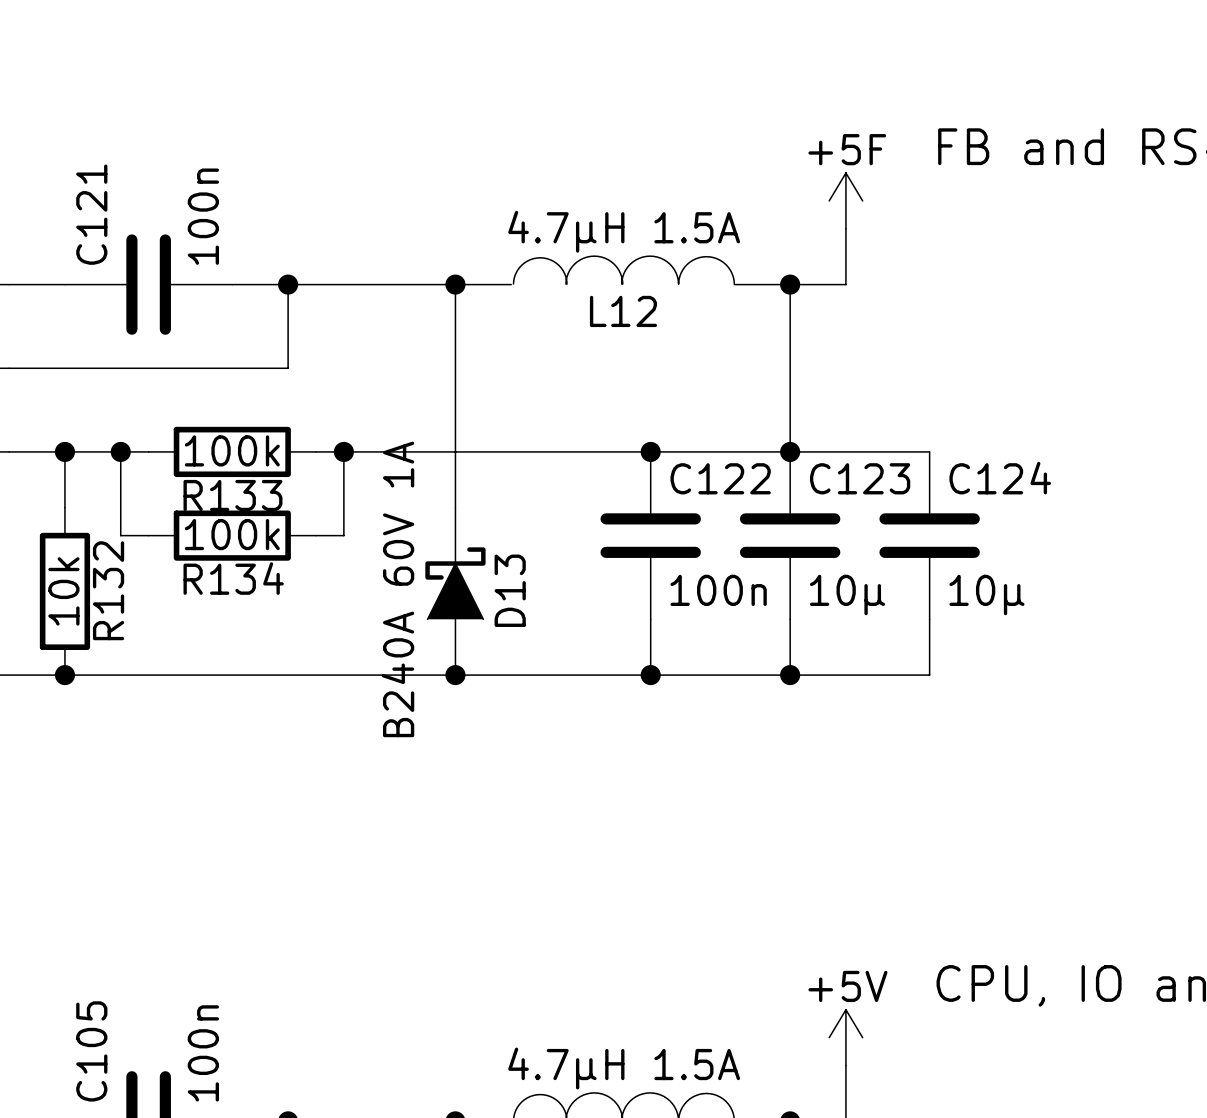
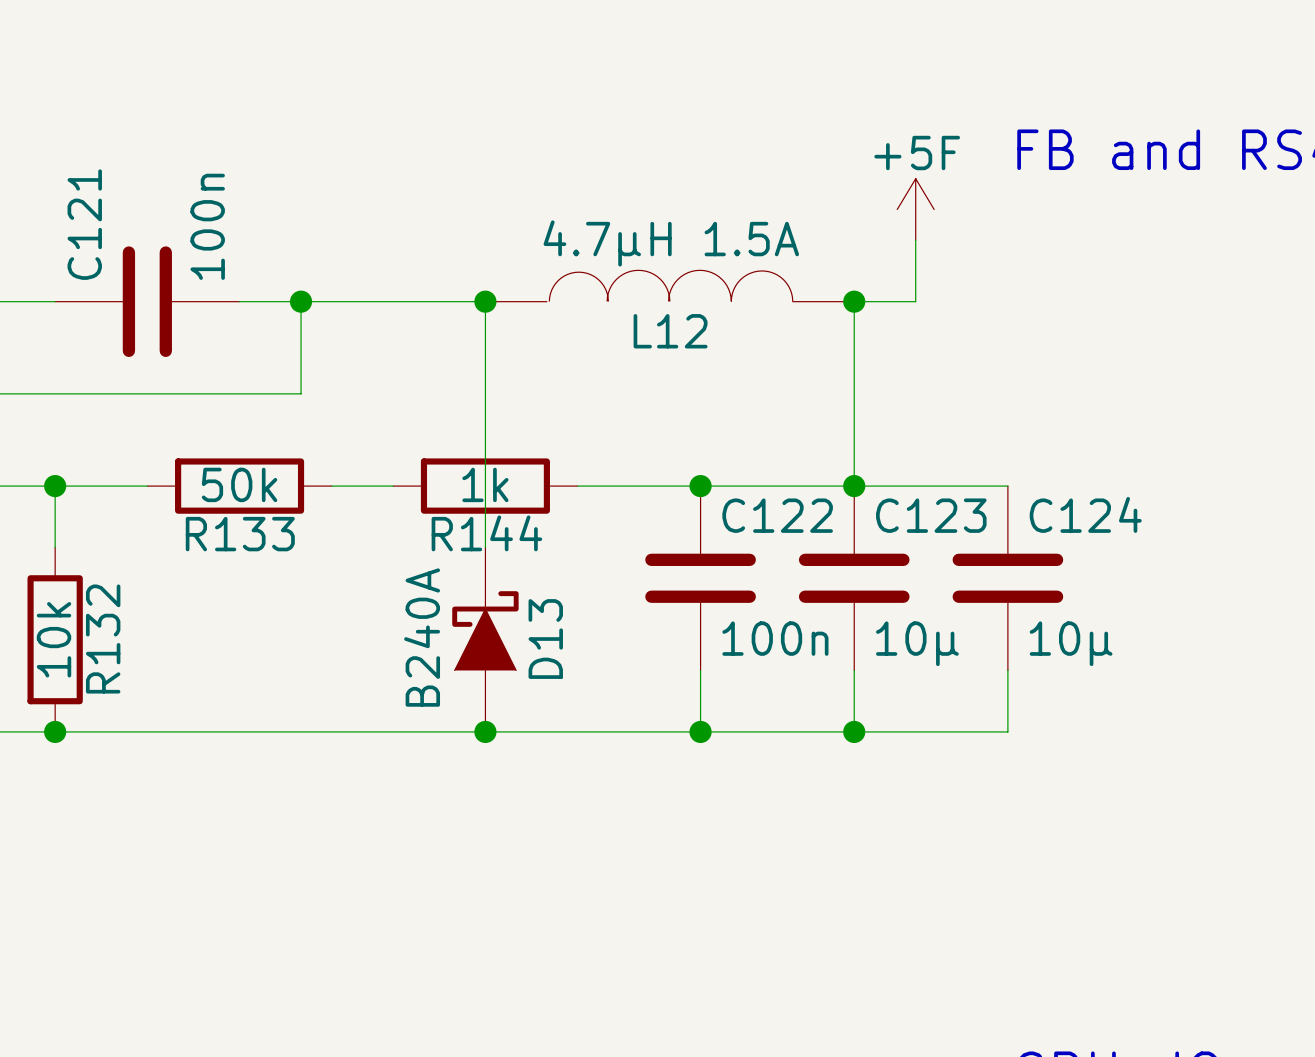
R133 value: 100k (232, 450) -> 50k (239, 484)
wire: (120, 451) (120, 535) (148, 535) -> none
junction: (120, 451) -> none
wire: (343, 451) (343, 535) (315, 535) -> none
junction: (343, 451) -> none
wire: (371, 451) (539, 451) -> none
R144: none -> 1k (485, 486)
R134: 100k (232, 535) -> none
D13 value: B240A 60V 1A (397, 589) -> B240A (422, 637)

